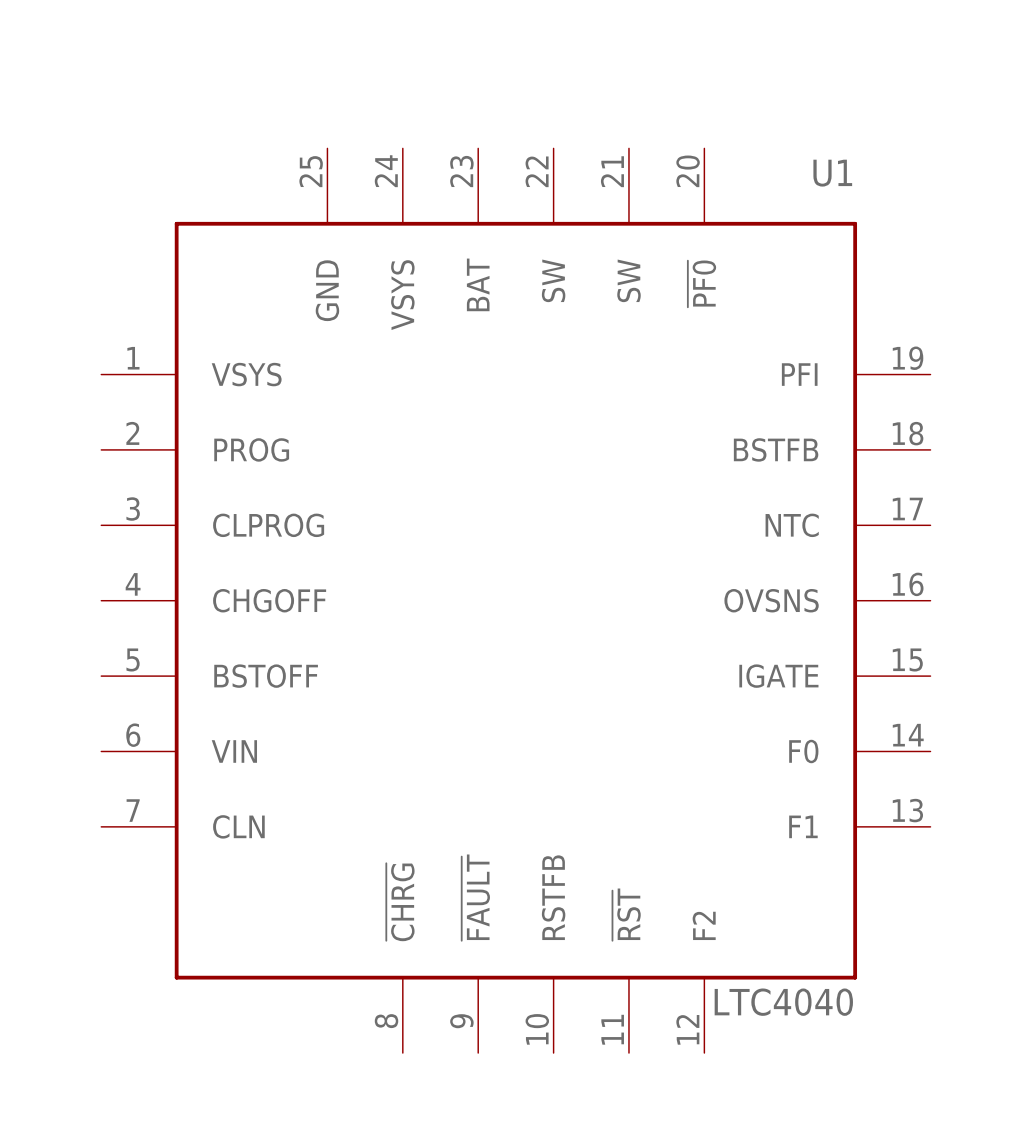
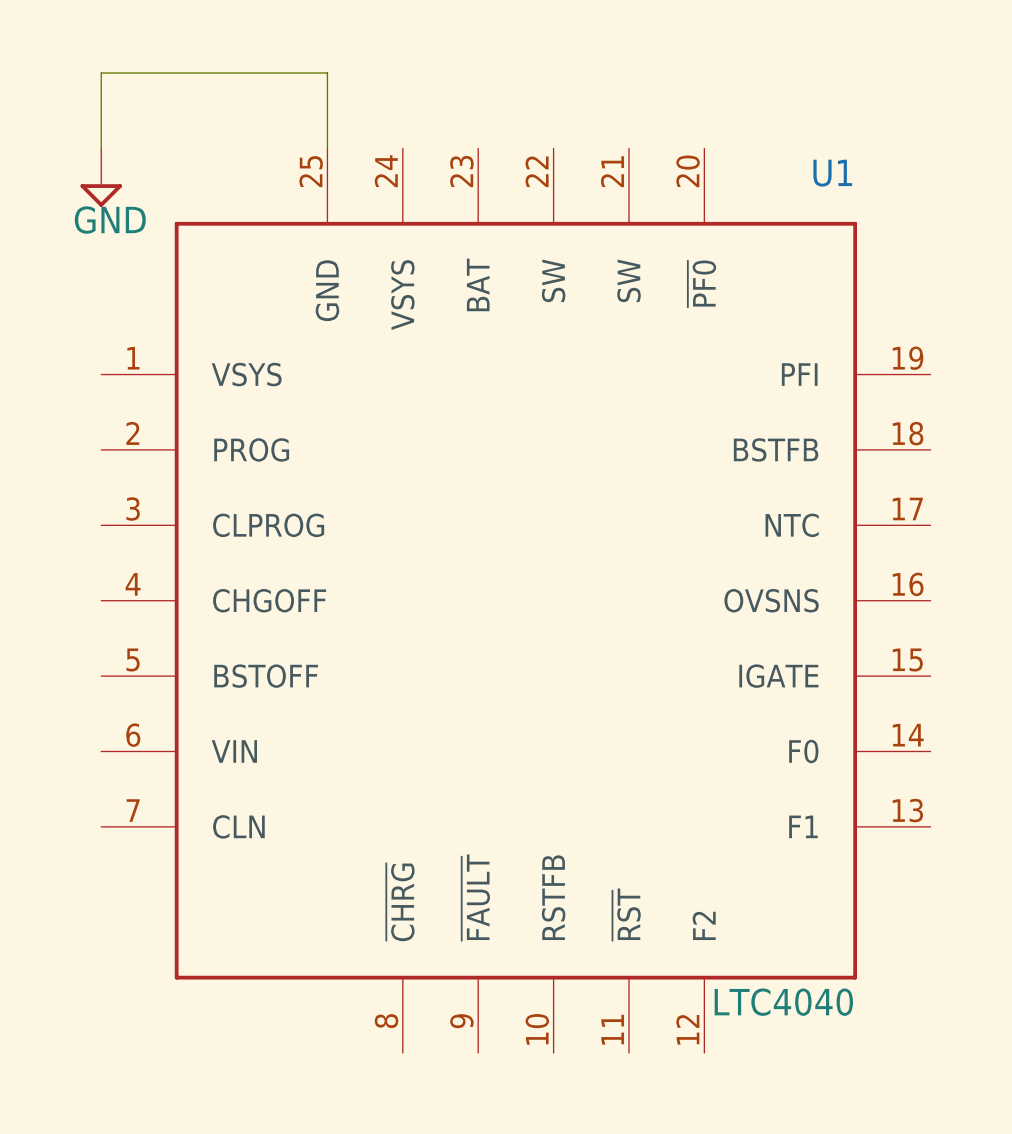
wire: none -> (101, 148) (101, 73) (327, 73) (327, 148)
power symbol: none -> GND (101, 177)

